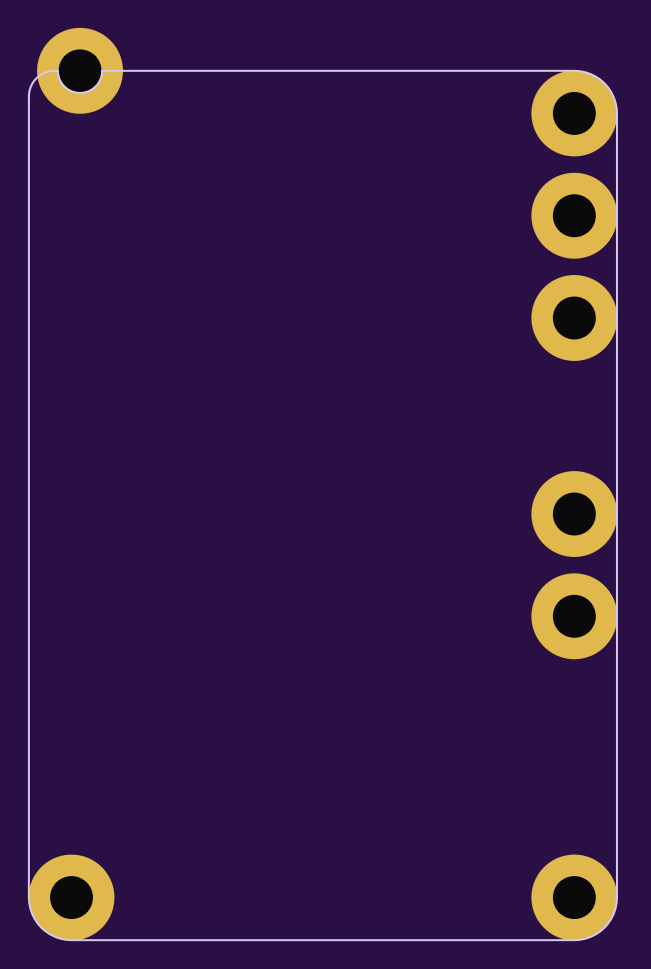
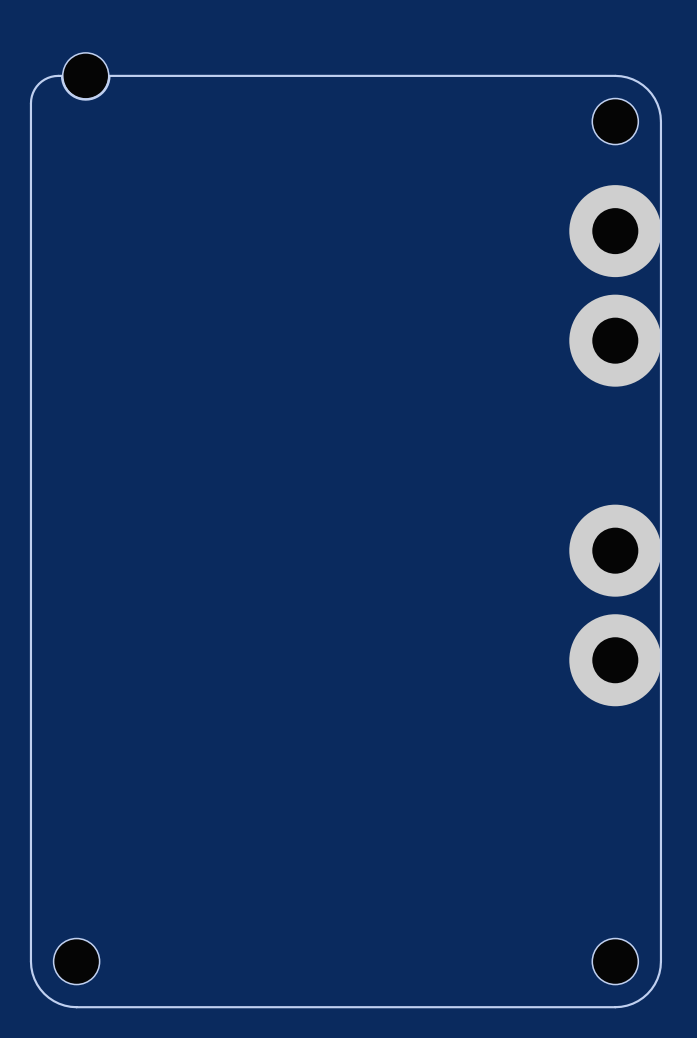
part footprint: [37, 27, 123, 114] -> [62, 52, 109, 99]
part footprint: [531, 70, 618, 157] -> [592, 98, 639, 145]
part footprint: [28, 854, 115, 941] -> [53, 938, 100, 985]
part footprint: [531, 854, 618, 941] -> [592, 938, 639, 985]

